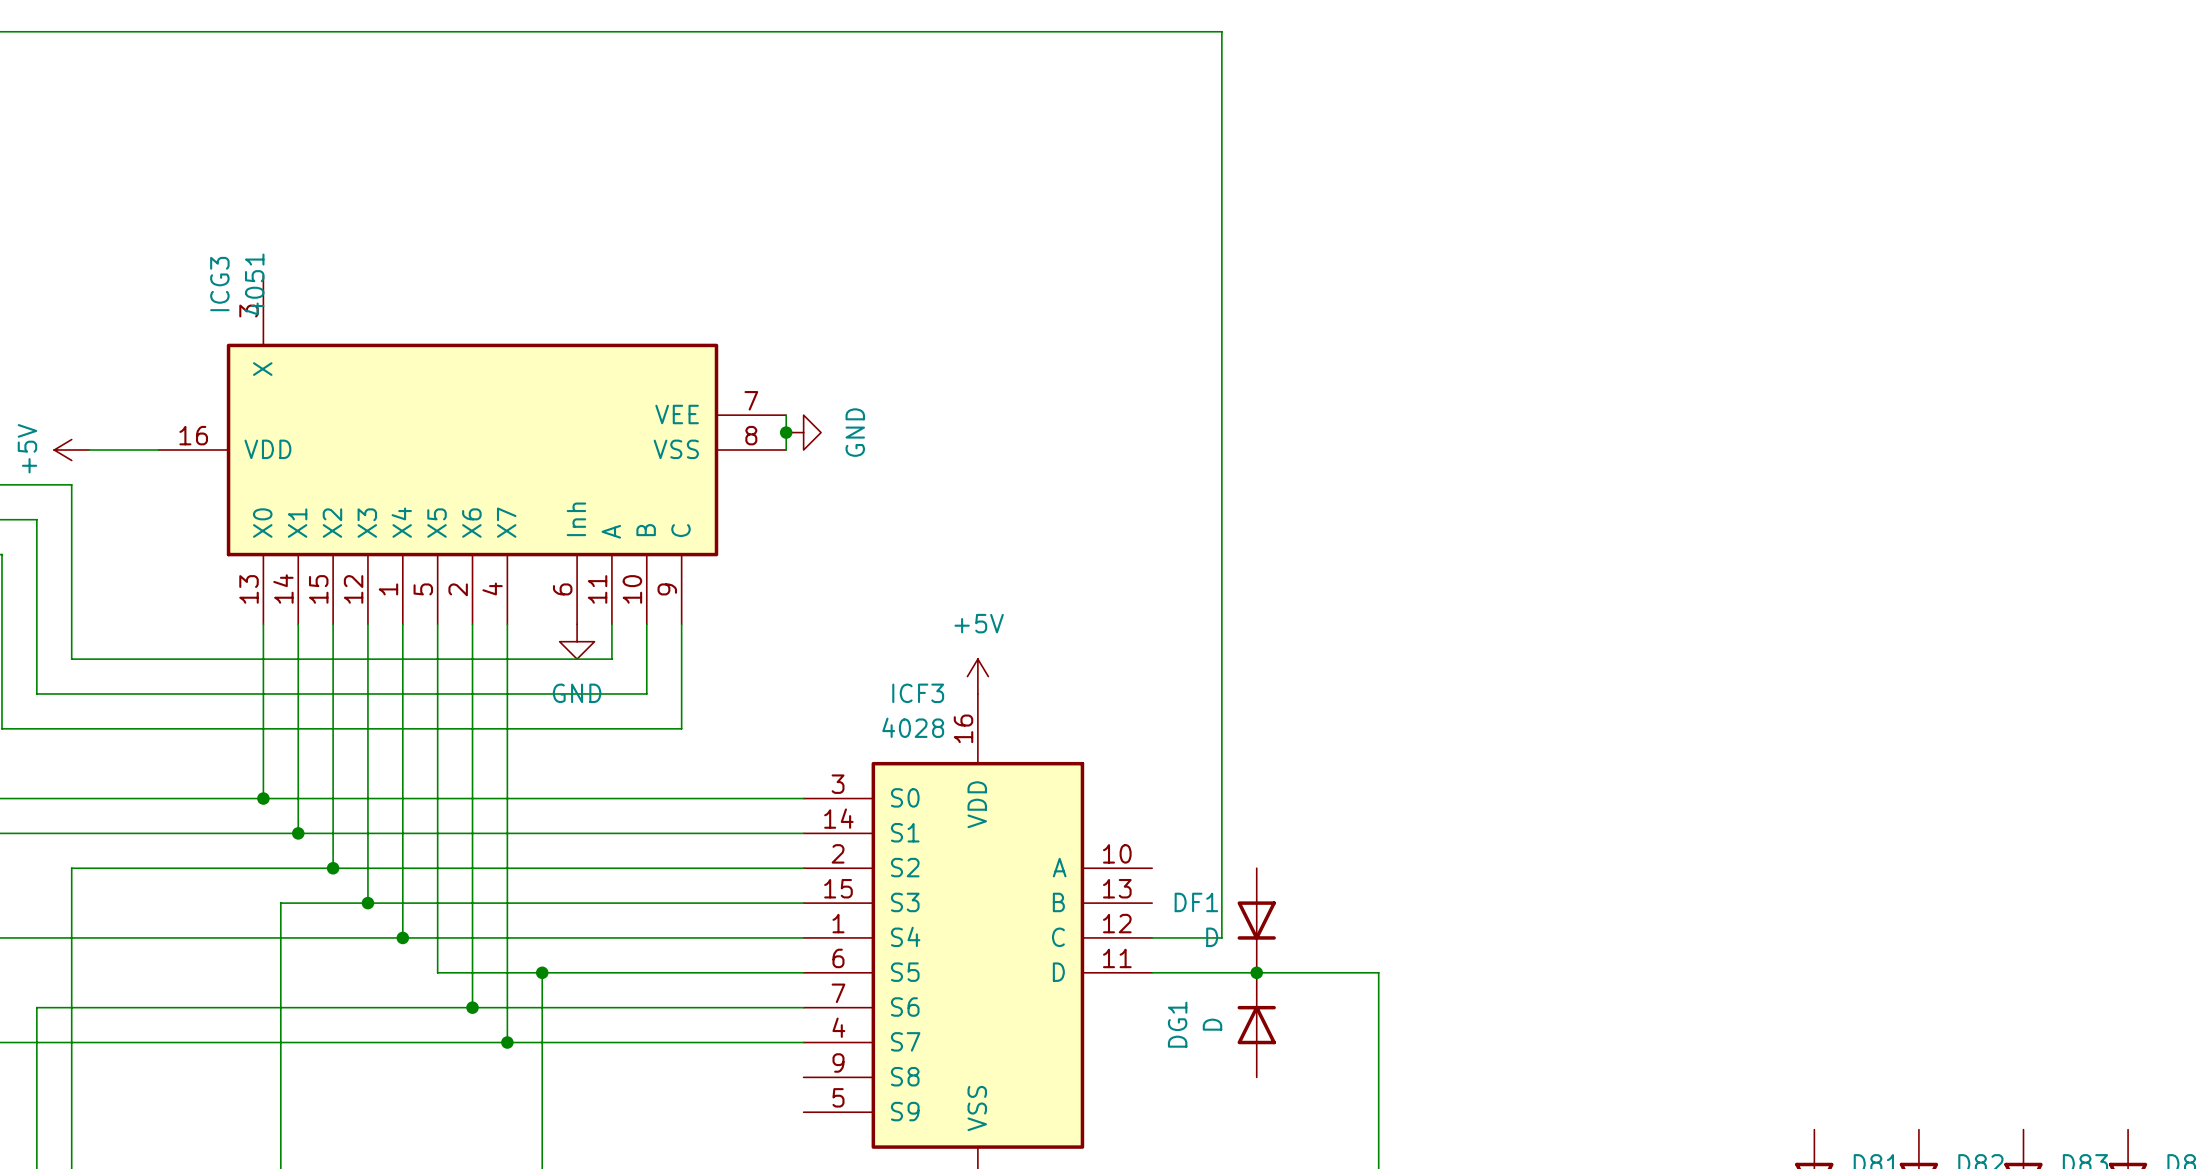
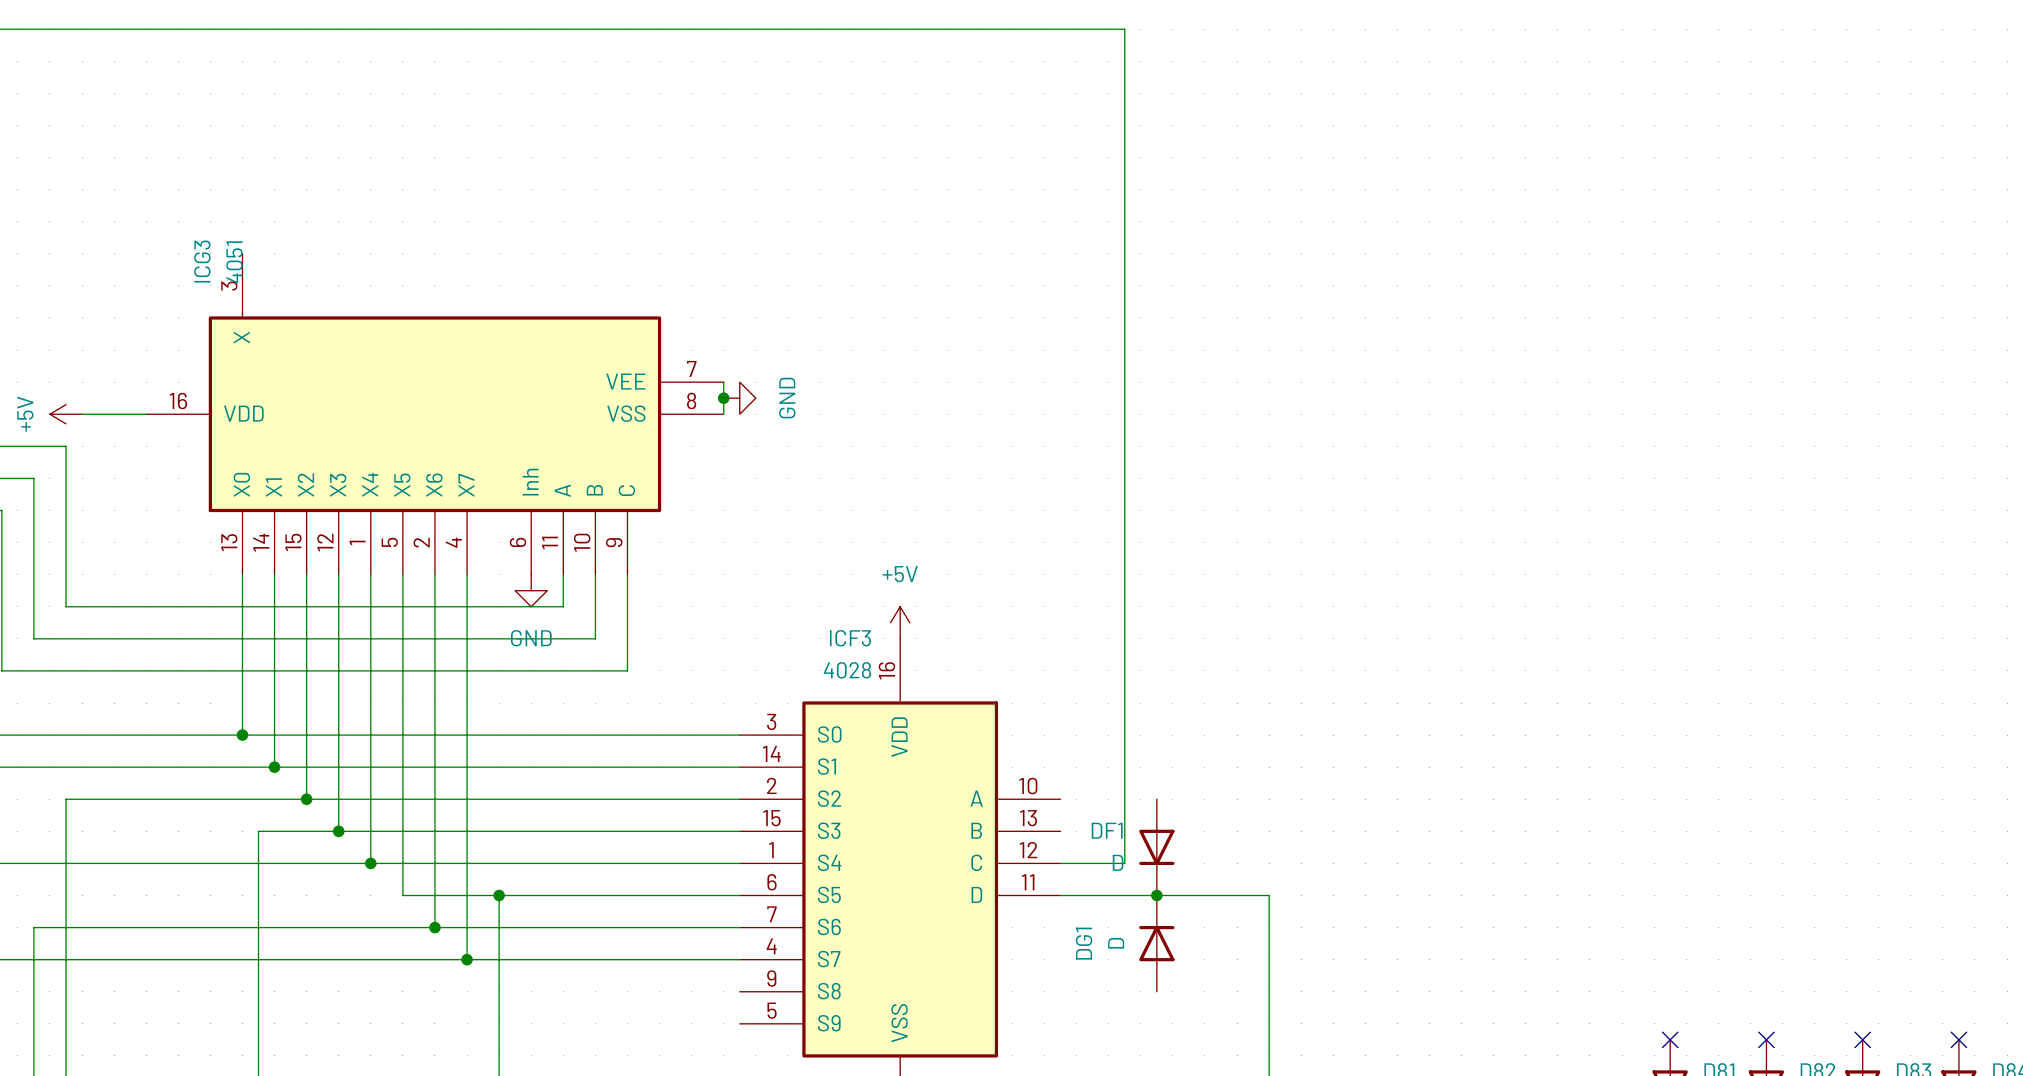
no-connect mark: none -> (1670, 1039)
no-connect mark: none -> (1766, 1039)
no-connect mark: none -> (1862, 1039)
no-connect mark: none -> (1958, 1039)

